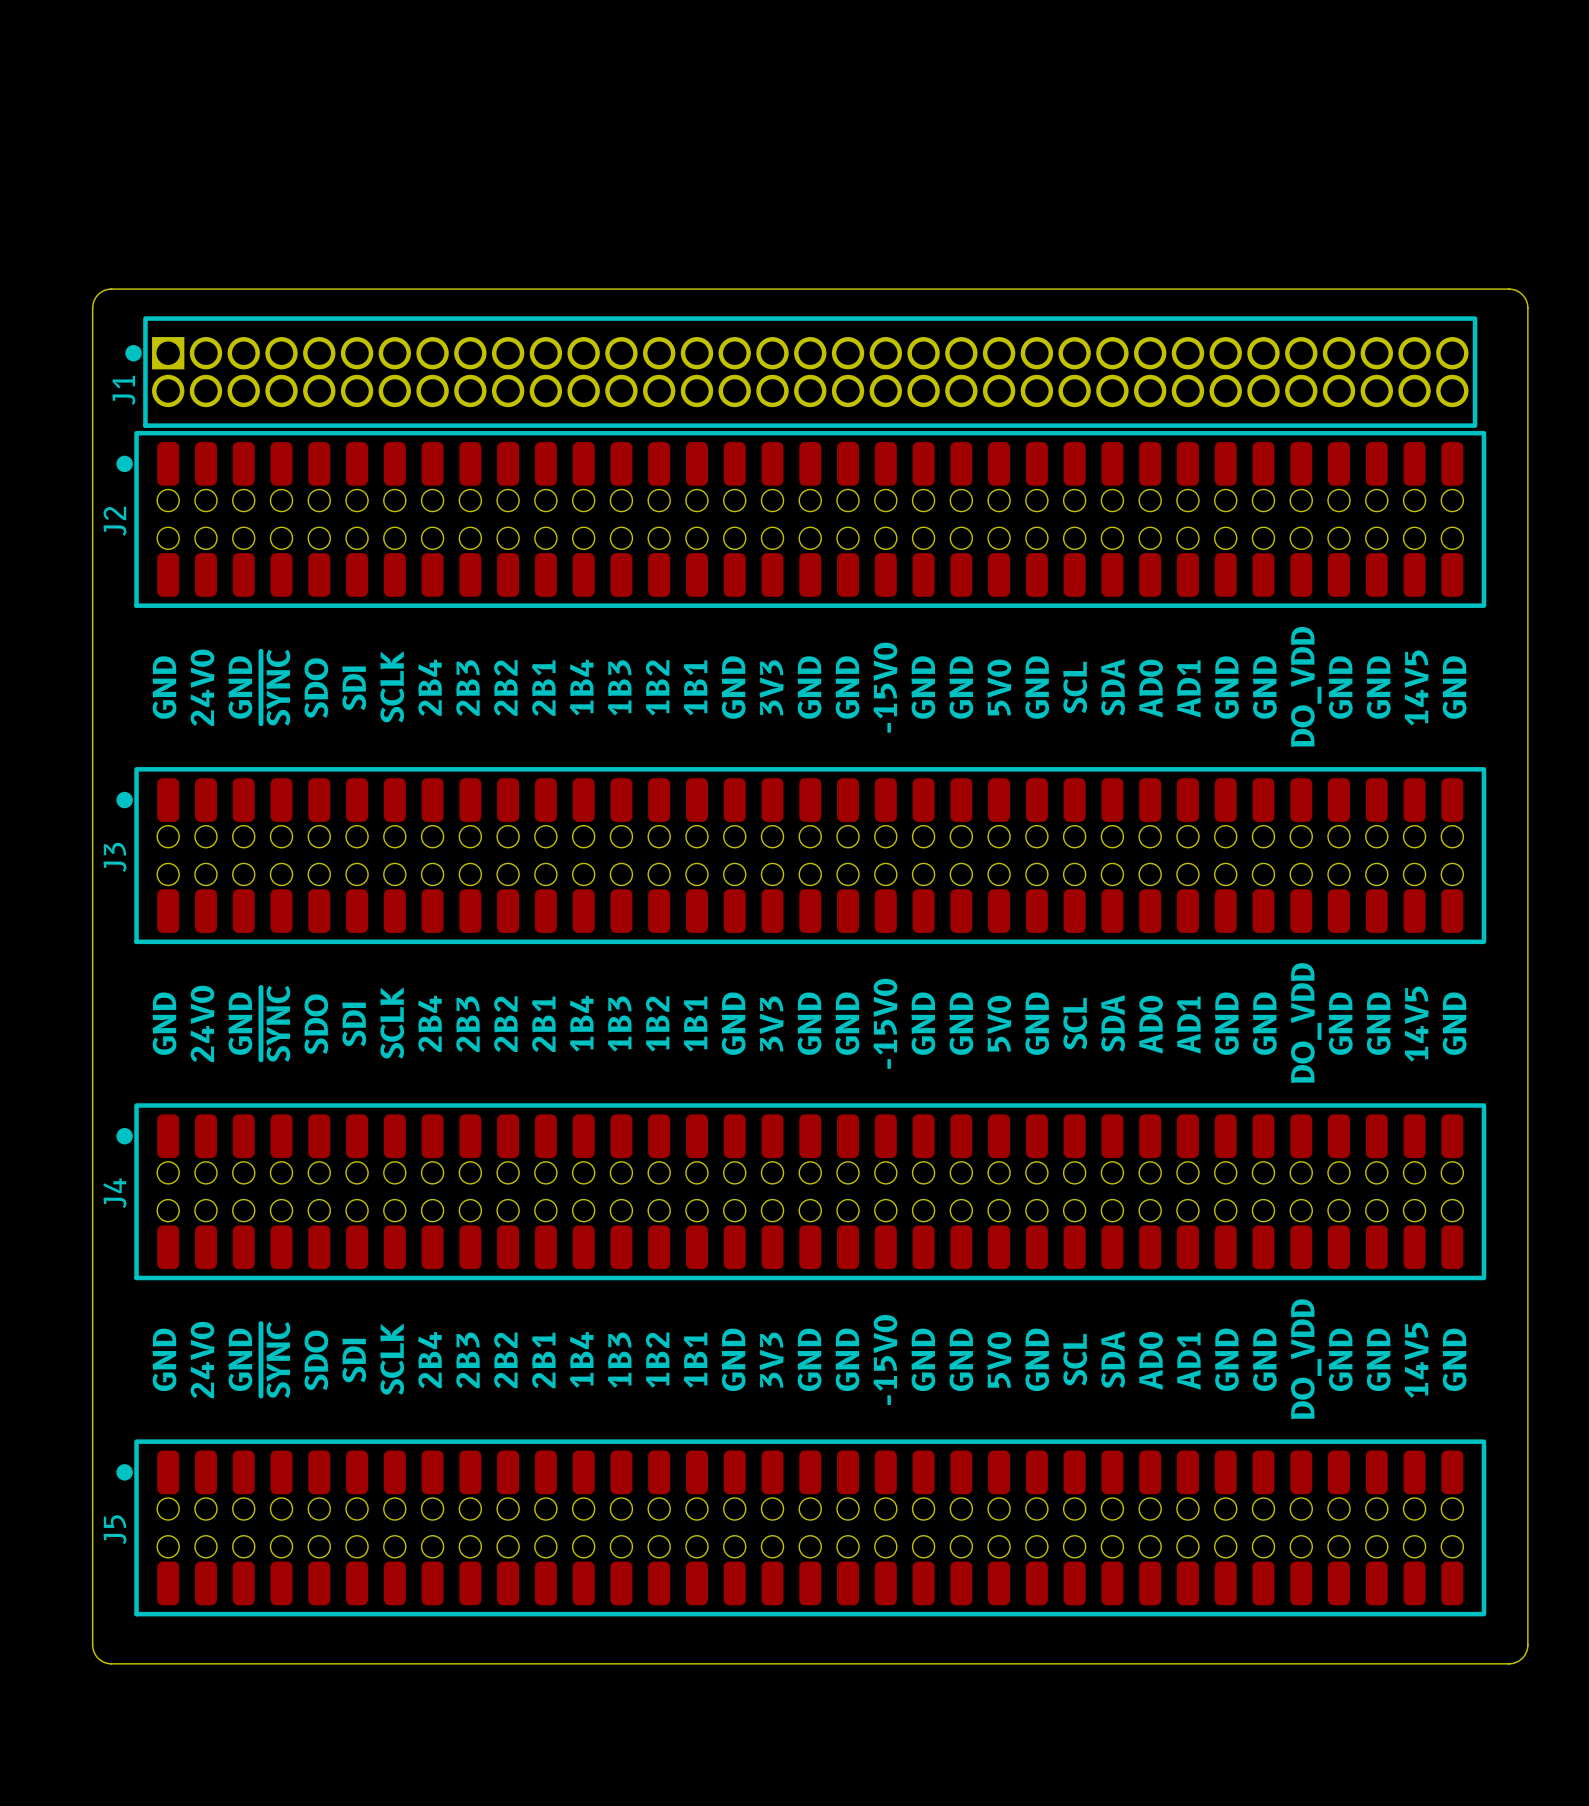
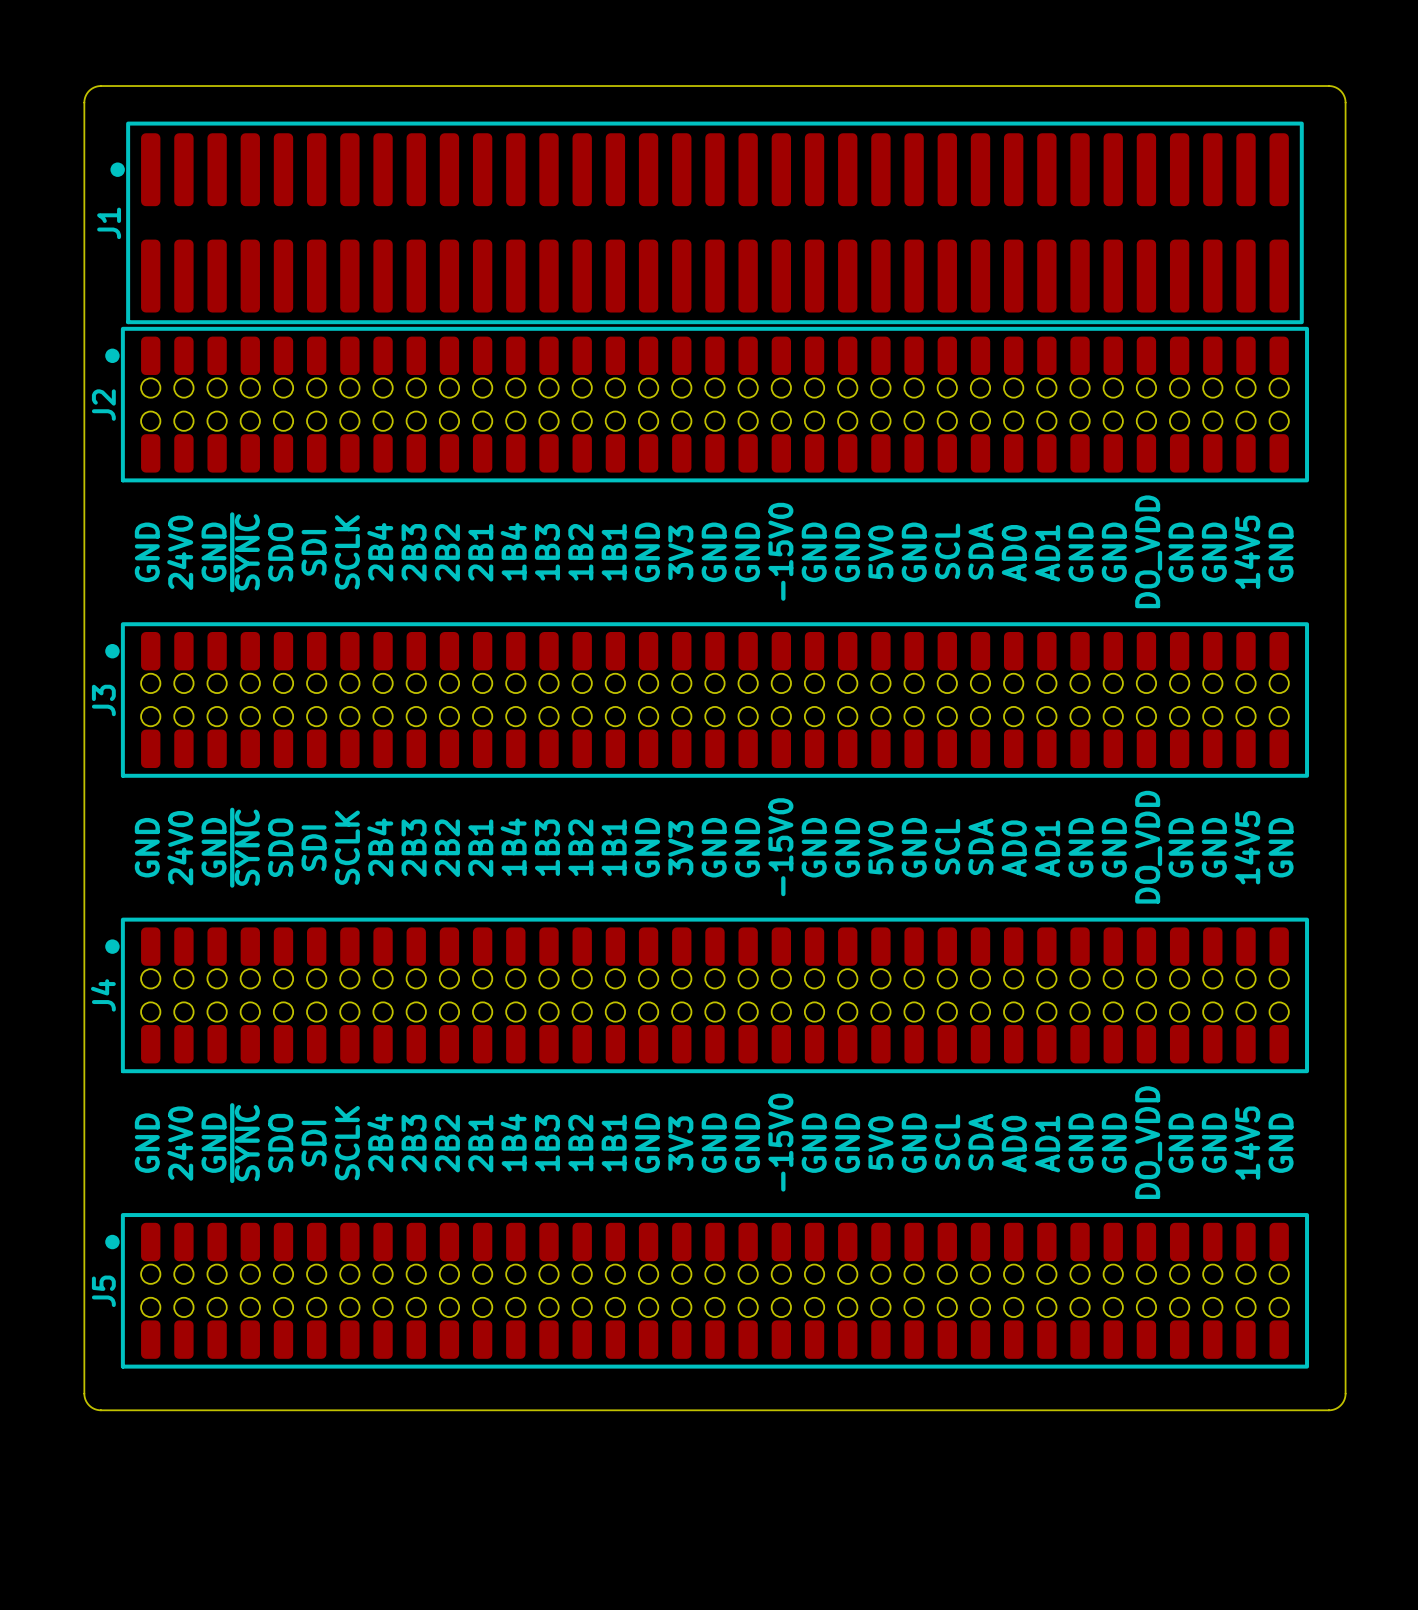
board edge: (92, 307) (98, 294) (111, 289) (1508, 289) (1522, 294) (1527, 307) -> (84, 218) (84, 100) (89, 90) (100, 86) (1330, 86) (1340, 90) (1345, 100) (1345, 218)
J1 footprint: [125, 316, 1478, 428] -> [110, 121, 1304, 325]

